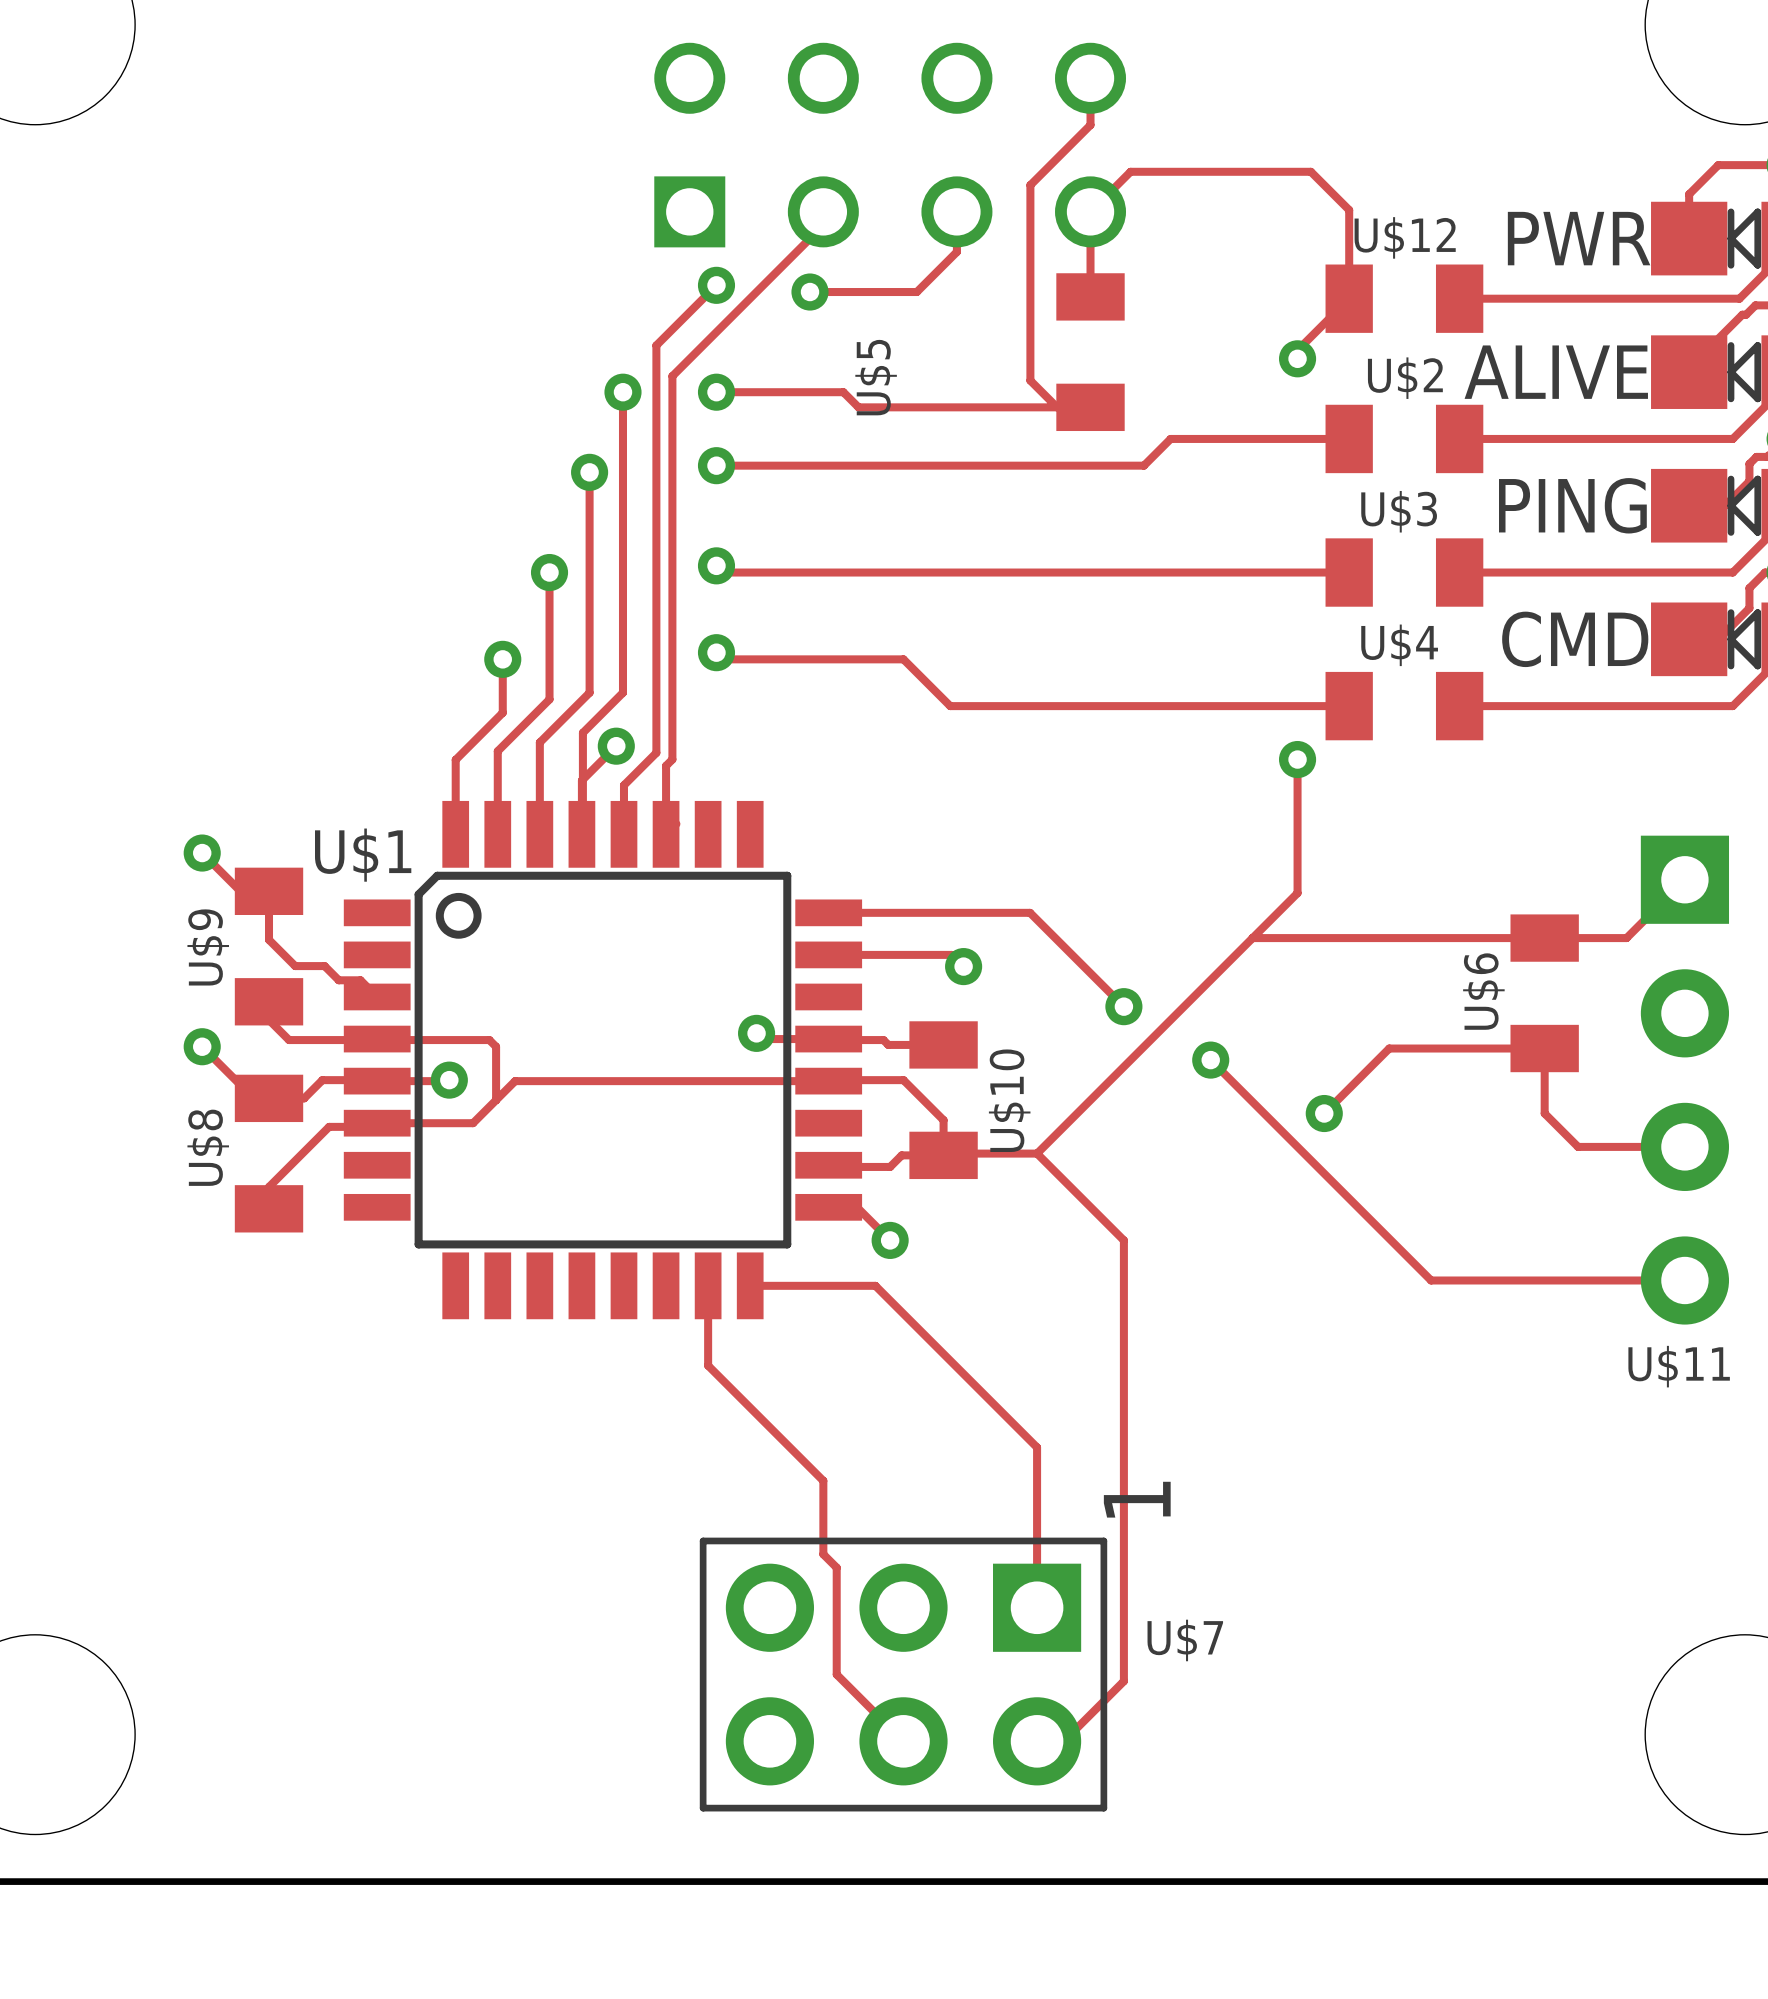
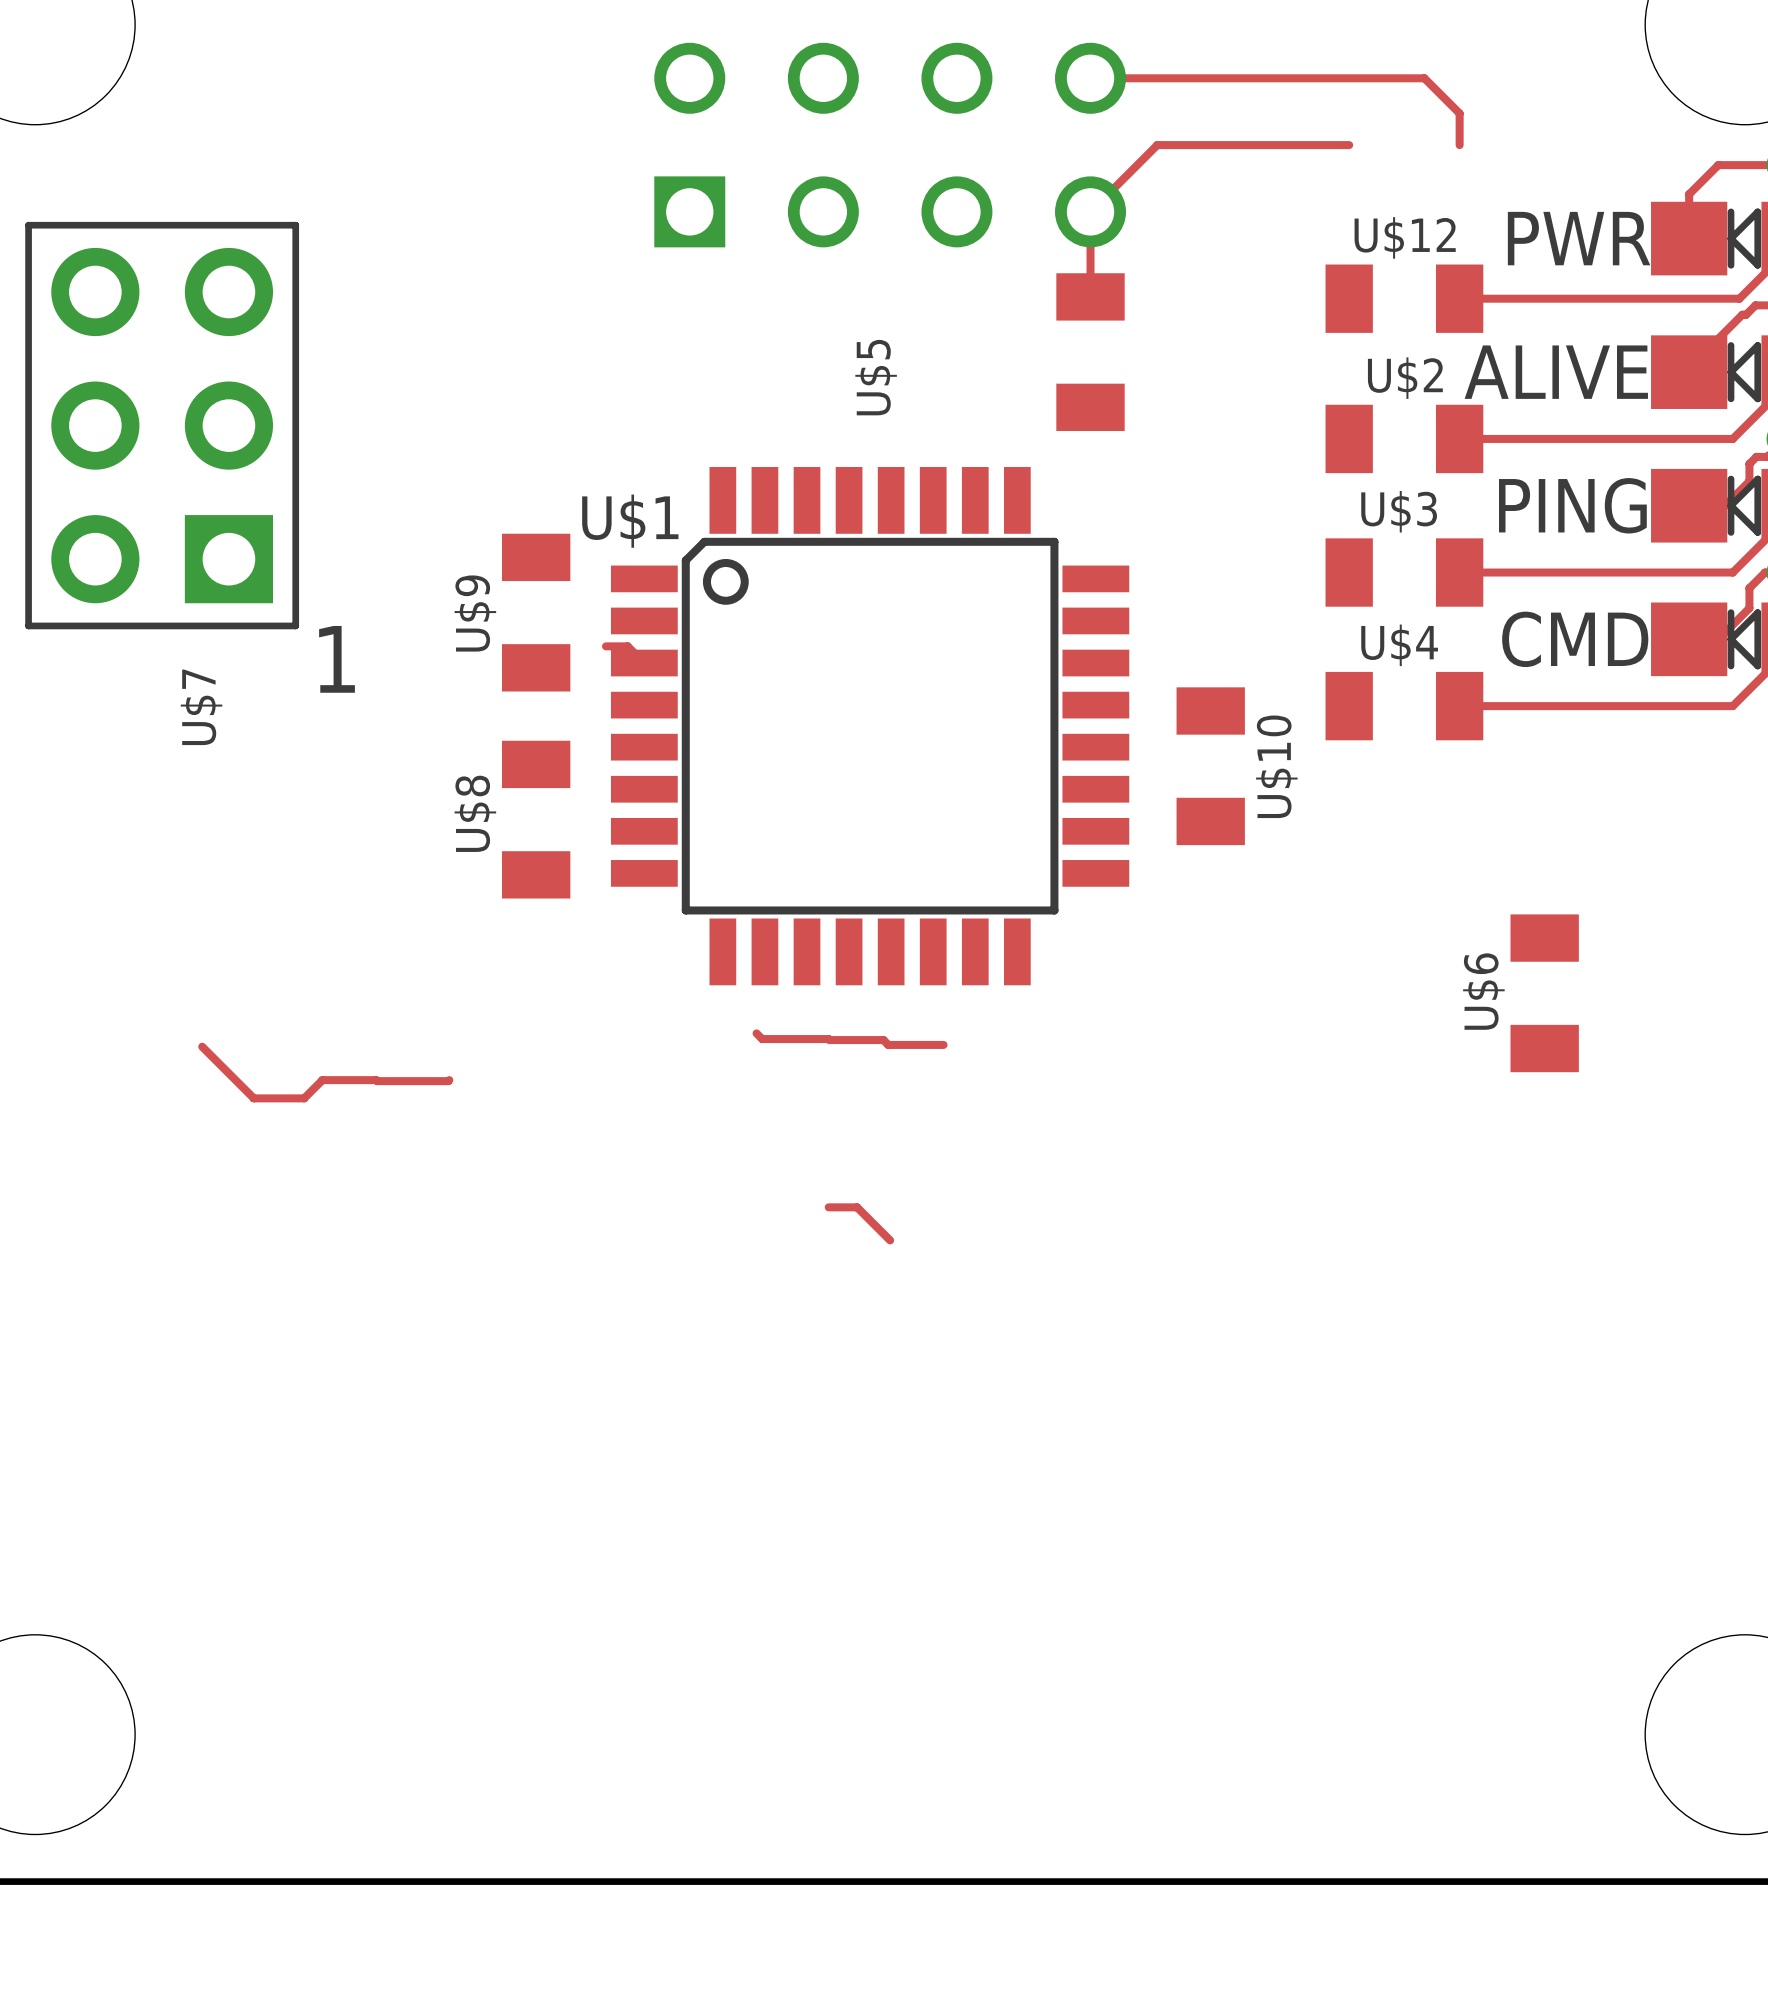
track: (1090, 78) (1090, 125) (1030, 185) (1030, 380) (1057, 407) -> (1090, 78) (1424, 78) (1459, 113) (1459, 145)
track: (1130, 171) (1310, 171) (1349, 210) (1349, 298) (1297, 350) (1297, 358) -> (1130, 171) (1157, 145) (1349, 145)
track: (823, 211) (823, 225) (672, 376) (672, 759) (666, 765) (666, 834) (676, 823) -> none
track: (956, 211) (956, 251) (916, 292) (809, 292) -> none
track: (716, 285) (656, 345) (656, 752) (623, 785) (623, 834) -> none
via: (716, 285) -> none
via: (809, 292) -> none
via: (1297, 358) -> none
track: (622, 392) (622, 692) (582, 732) (582, 833) (581, 834) (581, 780) (616, 746) -> none
via: (622, 392) -> none
track: (716, 392) (843, 392) (858, 407) (1090, 407) -> none
via: (716, 392) -> none
track: (1349, 438) (1170, 438) (1143, 465) (716, 465) -> none
via: (716, 465) -> none
track: (589, 472) (589, 692) (539, 742) (539, 834) -> none
via: (589, 472) -> none
track: (716, 565) (723, 572) (1349, 572) -> none
via: (716, 565) -> none
track: (549, 572) (549, 699) (497, 751) (497, 834) -> none
via: (549, 572) -> none
track: none -> (605, 646) (627, 646) (644, 663)
track: (716, 652) (723, 659) (903, 659) (950, 706) (1349, 706) -> none
via: (716, 652) -> none
track: (502, 659) (502, 712) (455, 759) (455, 834) -> none
via: (502, 659) -> none
via: (616, 746) -> none
track: (1297, 759) (1297, 893) (1037, 1153) -> none
via: (1297, 759) -> none
track: (202, 853) (240, 891) (269, 891) (269, 939) (295, 966) (324, 966) (338, 980) (360, 980) (377, 996) -> none
via: (202, 853) -> none
track: (1684, 879) (1626, 938) (1252, 938) -> none
track: (828, 912) (1030, 912) (1123, 1006) -> none
U$9 position: (269, 946) -> (536, 612)
track: (828, 954) (951, 954) (963, 966) -> none
via: (963, 966) -> none
track: (269, 1001) (269, 1020) (289, 1040) (489, 1040) (496, 1046) (496, 1100) -> none
via: (1123, 1006) -> none
via: (756, 1033) -> none
via: (202, 1046) -> none
U$1 position: (602, 1060) -> (870, 726)
track: (1210, 1060) (1431, 1280) (1684, 1280) -> none
via: (1210, 1060) -> none
via: (449, 1080) -> none
U$11: (1684, 1080) -> none
U$10 position: (943, 1100) -> (1210, 766)
track: (1324, 1113) (1389, 1048) (1544, 1048) (1544, 1113) (1578, 1146) (1684, 1146) -> none
via: (1324, 1113) -> none
U$8 position: (269, 1153) -> (536, 819)
track: (1037, 1153) (945, 1153) (943, 1155) -> none
track: (1037, 1153) (1123, 1240) (1123, 1681) (1063, 1741) (1037, 1741) -> none
track: (943, 1155) (901, 1155) (890, 1166) (830, 1166) (828, 1165) -> none
track: (943, 1155) (943, 1120) (903, 1080) (515, 1081) (473, 1123) (377, 1123) (373, 1126) (329, 1126) (269, 1186) (269, 1208) -> none
via: (890, 1240) -> none
track: (708, 1285) (708, 1365) (823, 1480) (823, 1554) (836, 1567) (836, 1674) (903, 1741) -> none
track: (750, 1285) (875, 1285) (1037, 1447) (1037, 1607) -> none
U$7 rotation: 0° (903, 1674) -> 90° clockwise (162, 425)
U$7 position: (903, 1674) -> (162, 425)

